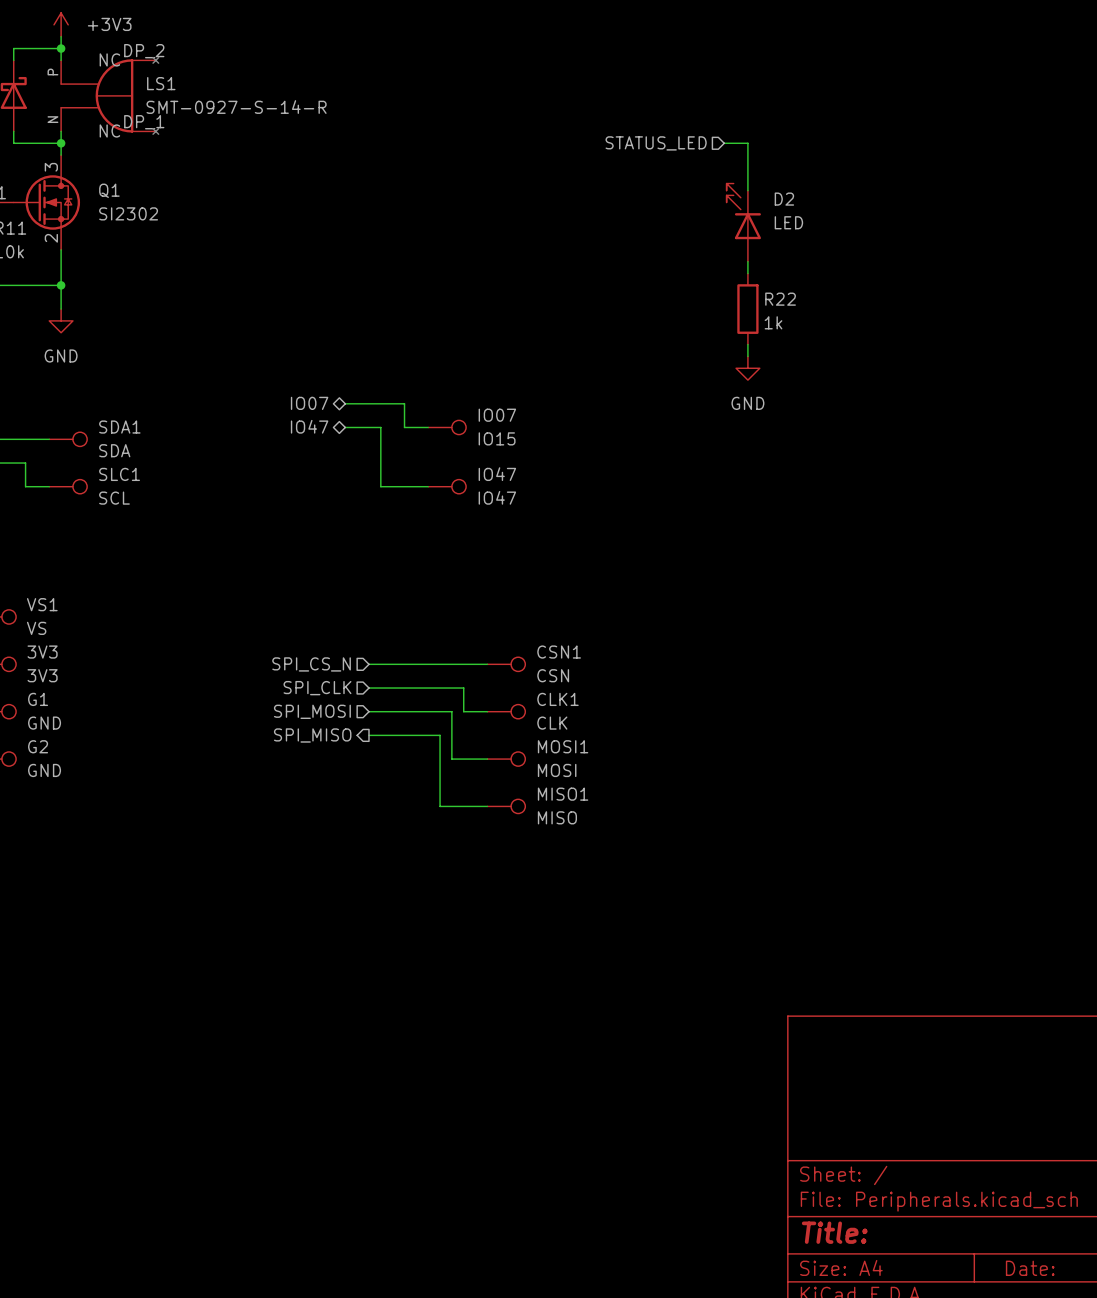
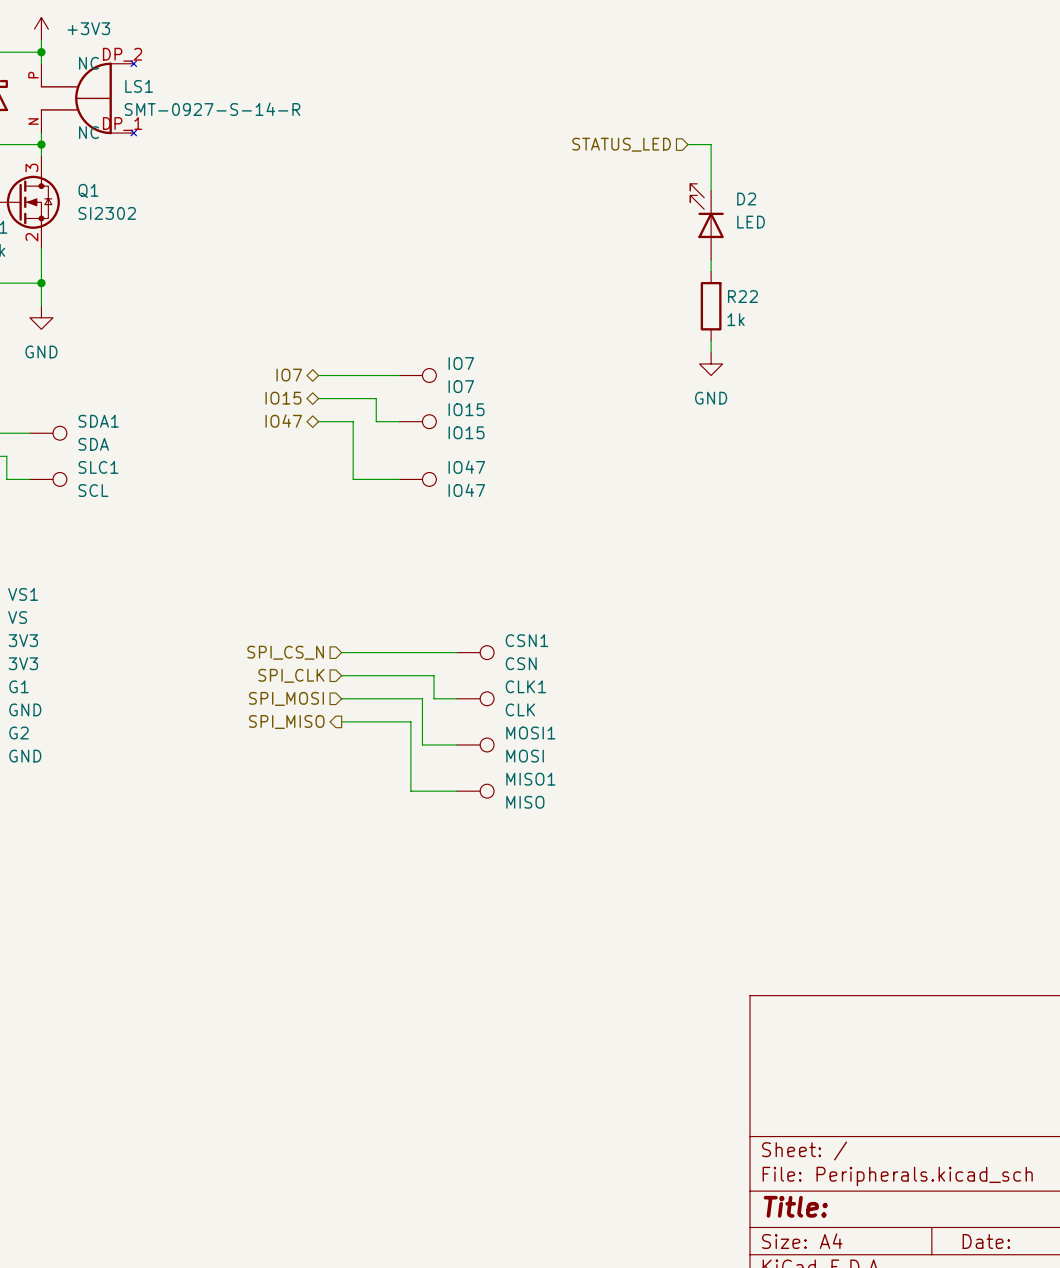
hierarchical label: none -> IO7 (289, 375)
wire: none -> (318, 375) (399, 375)
IO7: none -> IO7 (417, 375)
hierarchical label: IO07 (309, 403) -> IO15 (283, 398)
IO07 name: IO07 (497, 415) -> IO15 (466, 409)

